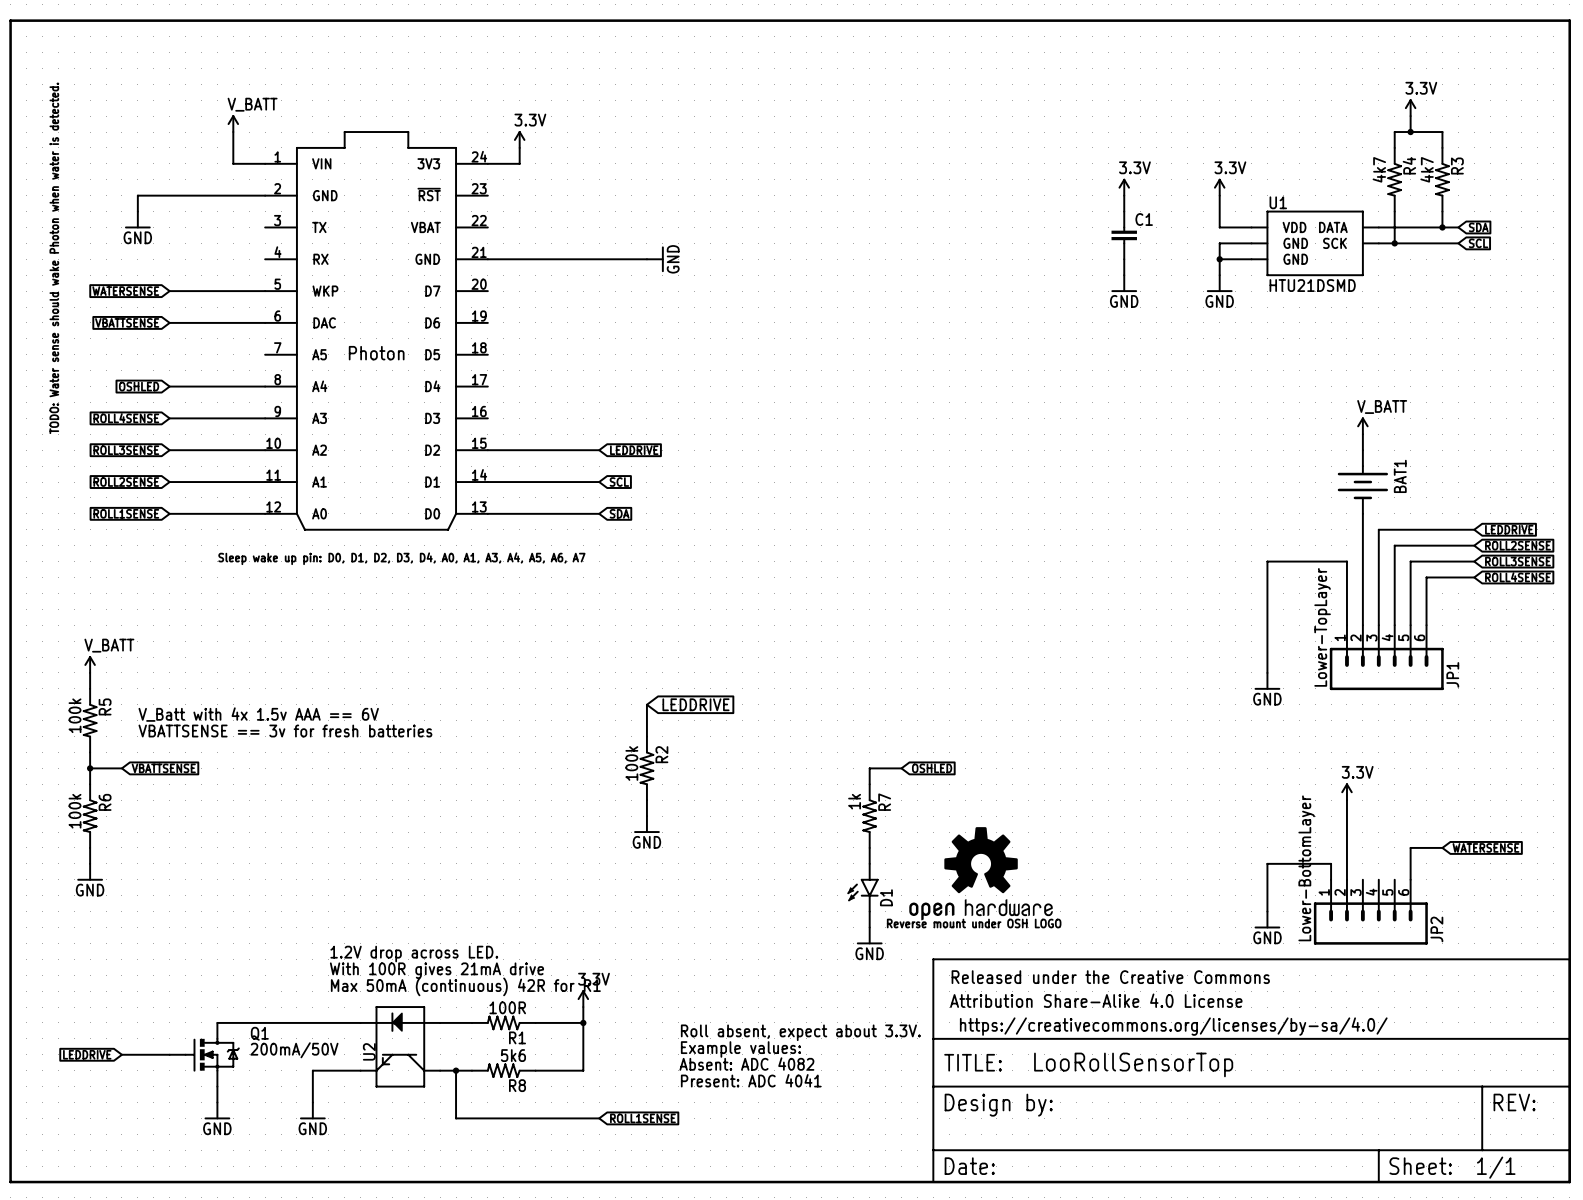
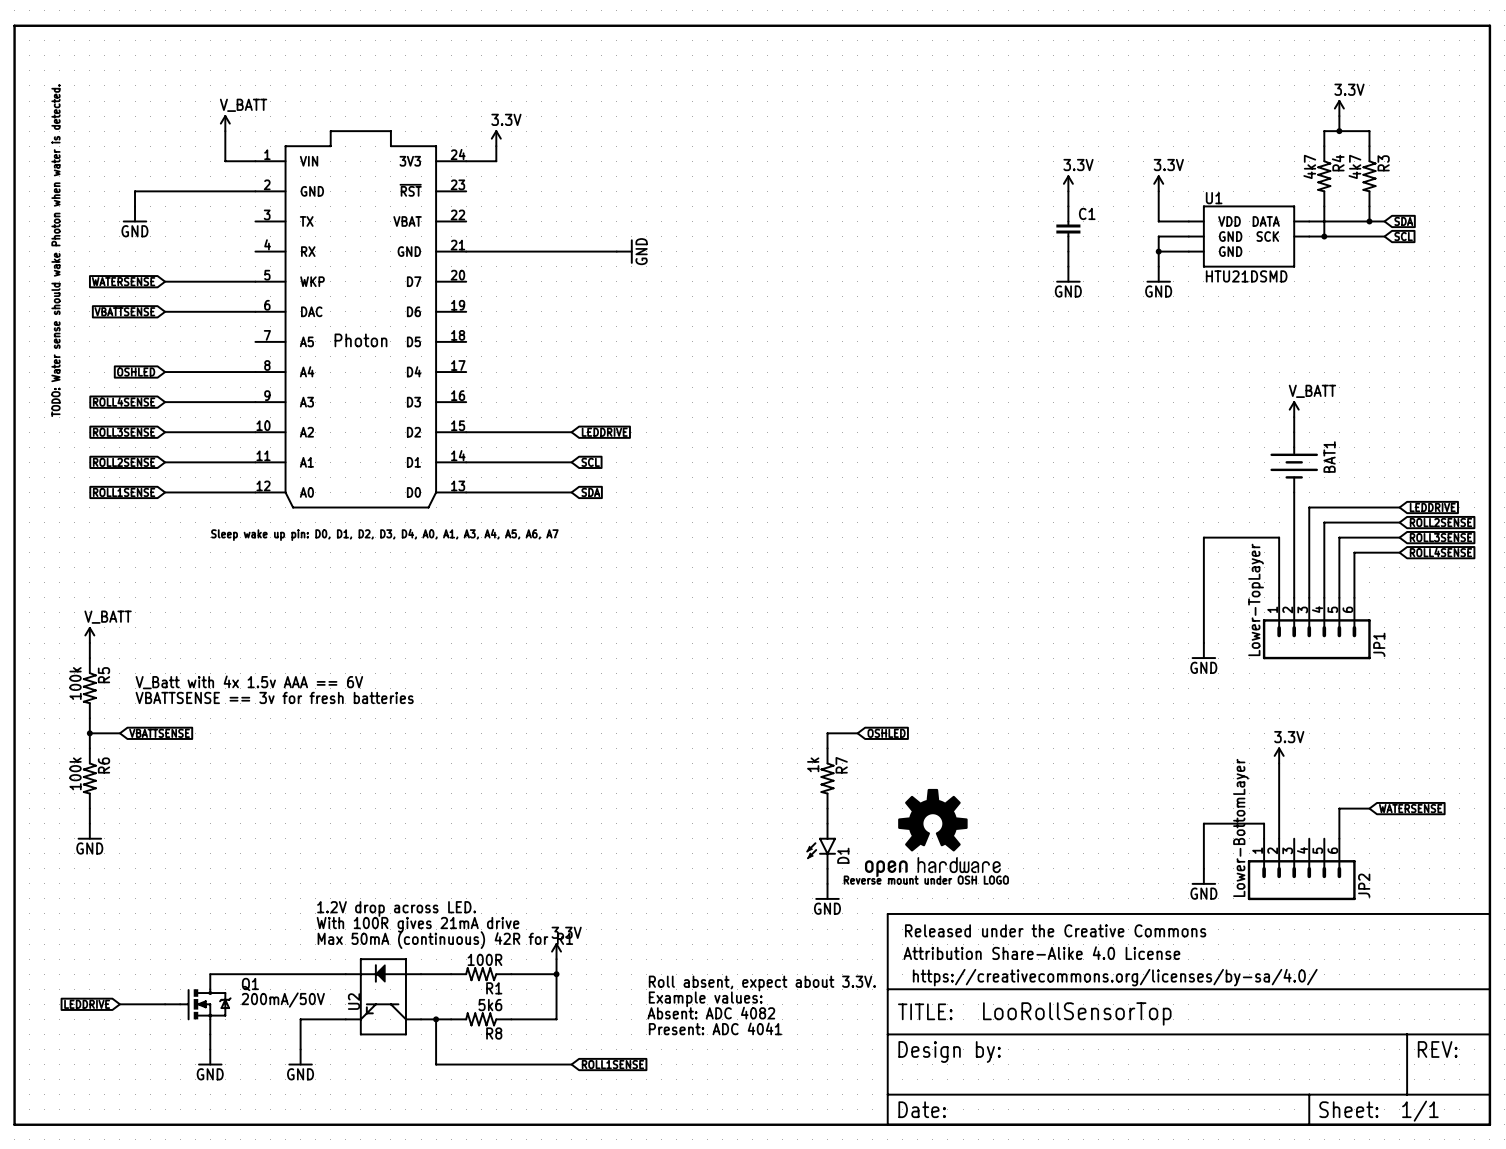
wire: (646, 704) (646, 736) -> none
global label: LEDDRIVE (695, 704) -> none
R2: 100k (646, 768) -> none
wire: (646, 800) (646, 816) -> none
power symbol: GND (646, 824) -> none

